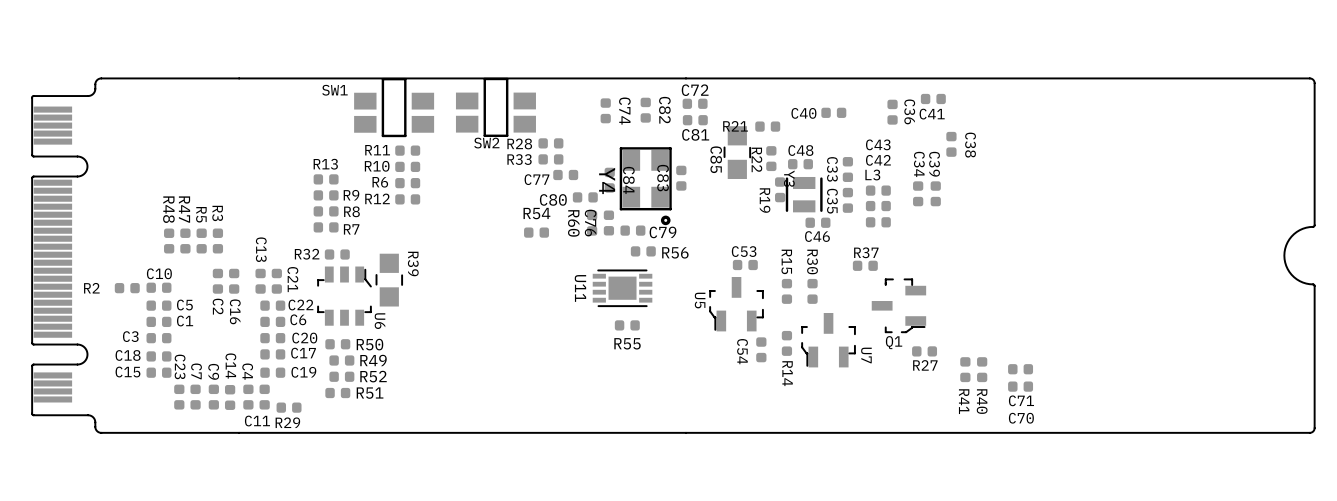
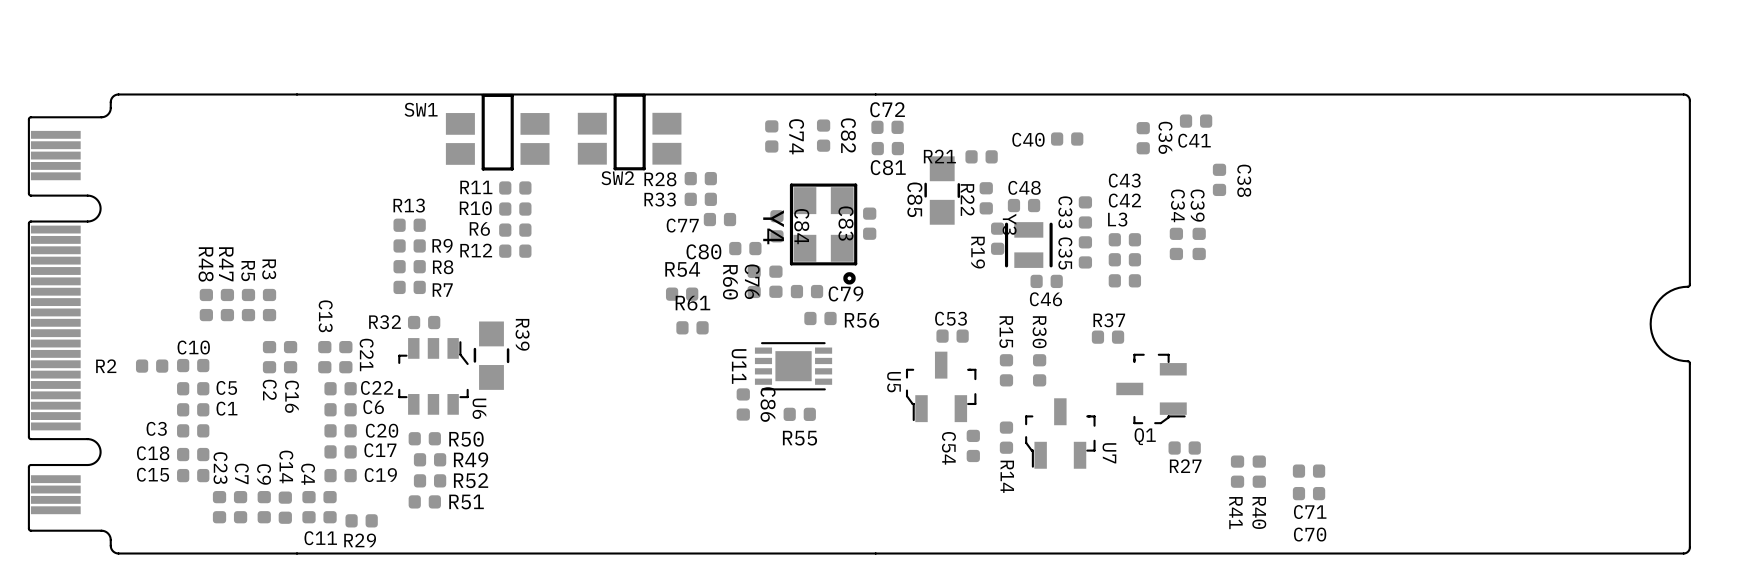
R61: none -> (692, 327)
C86: none -> (743, 404)

